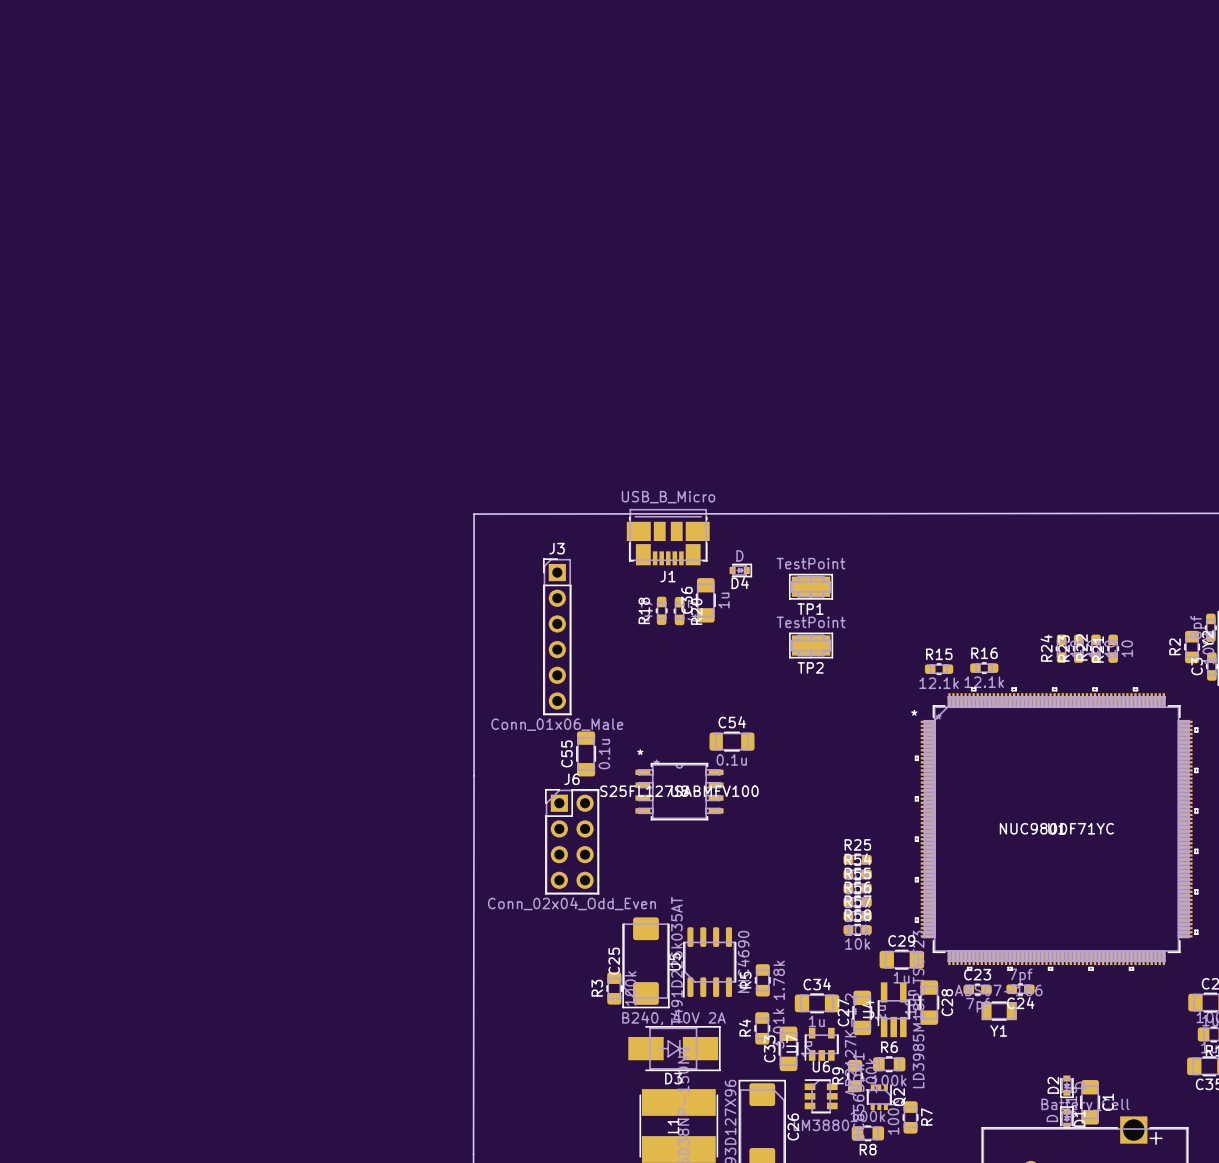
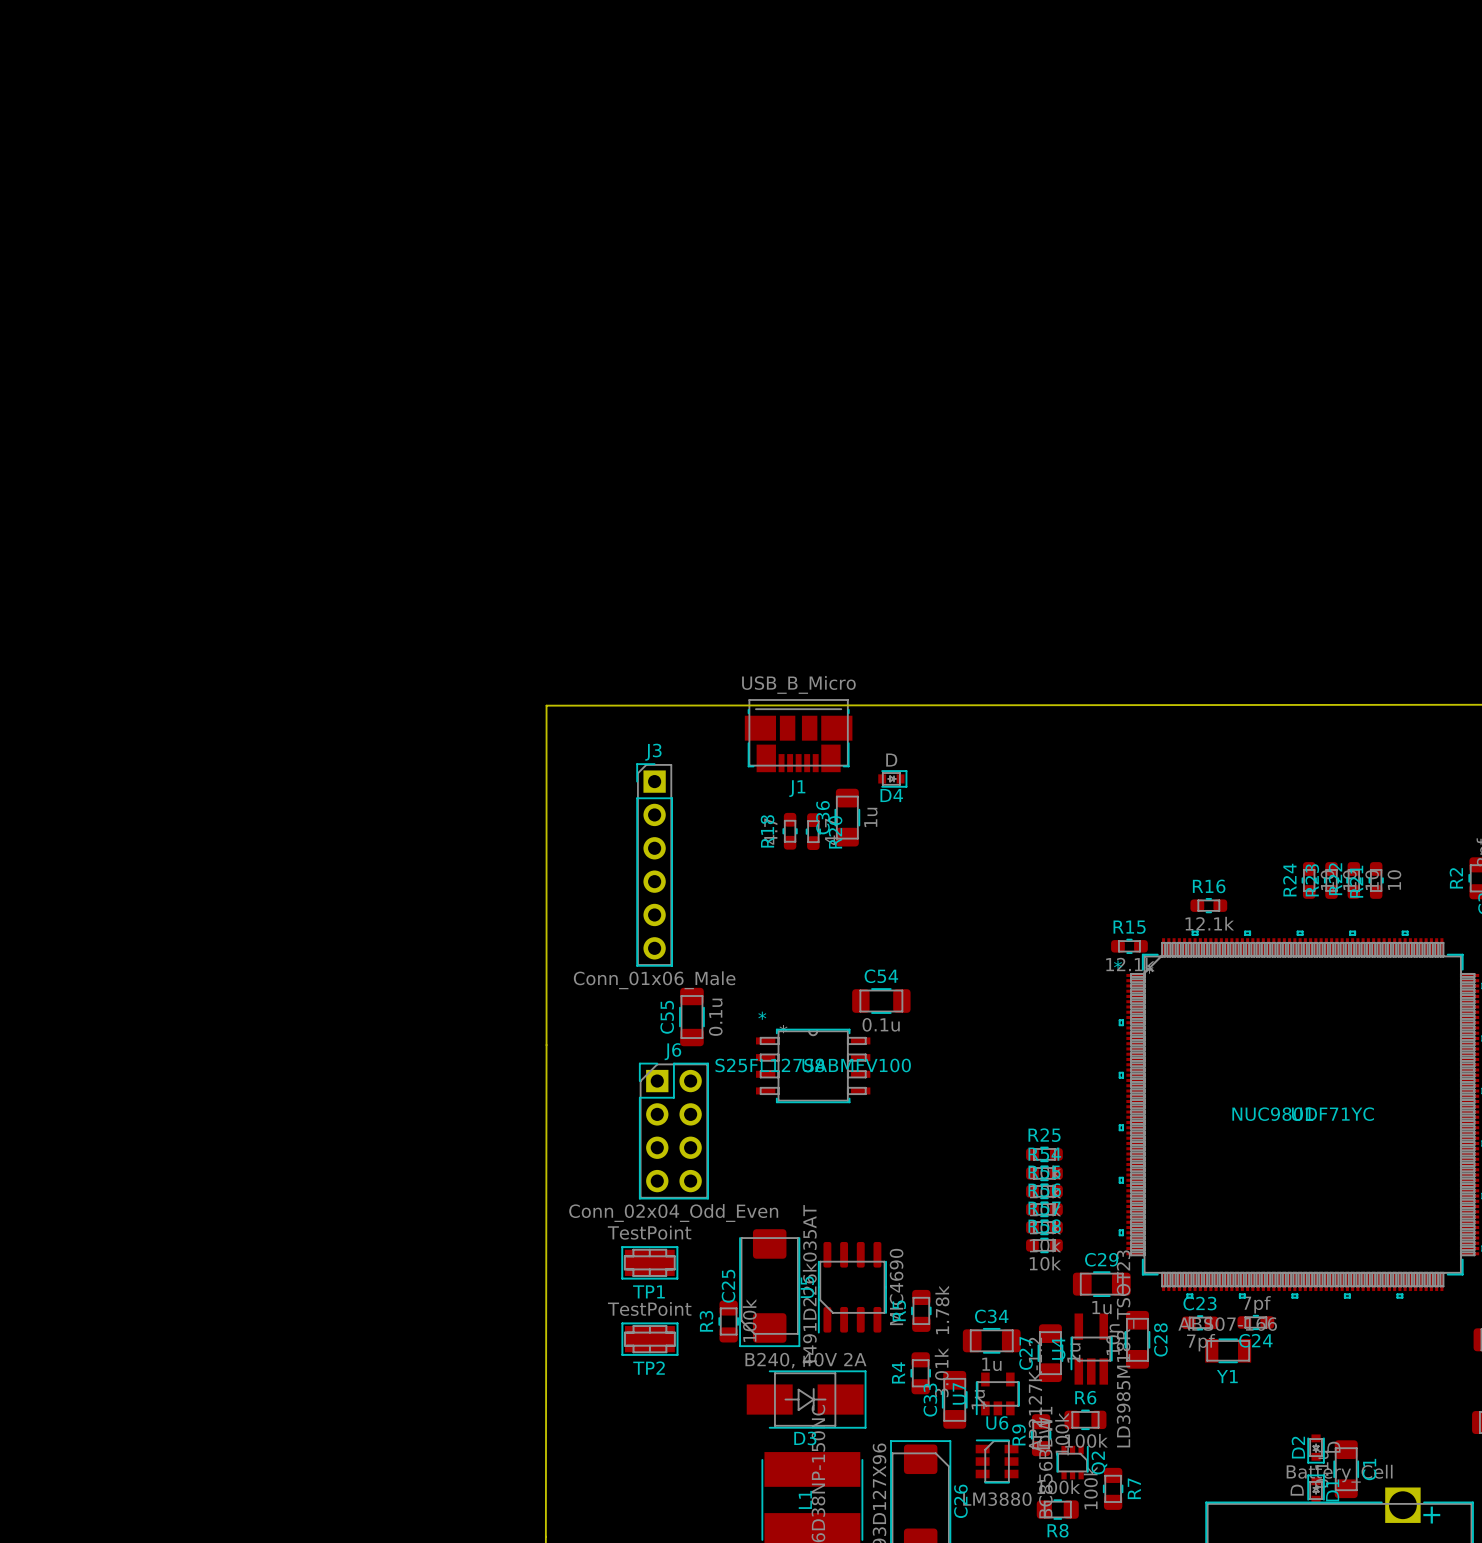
TP1 position: (811, 586) -> (649, 1262)
TP2 position: (811, 645) -> (649, 1339)
R15 position: (939, 669) -> (1129, 946)

